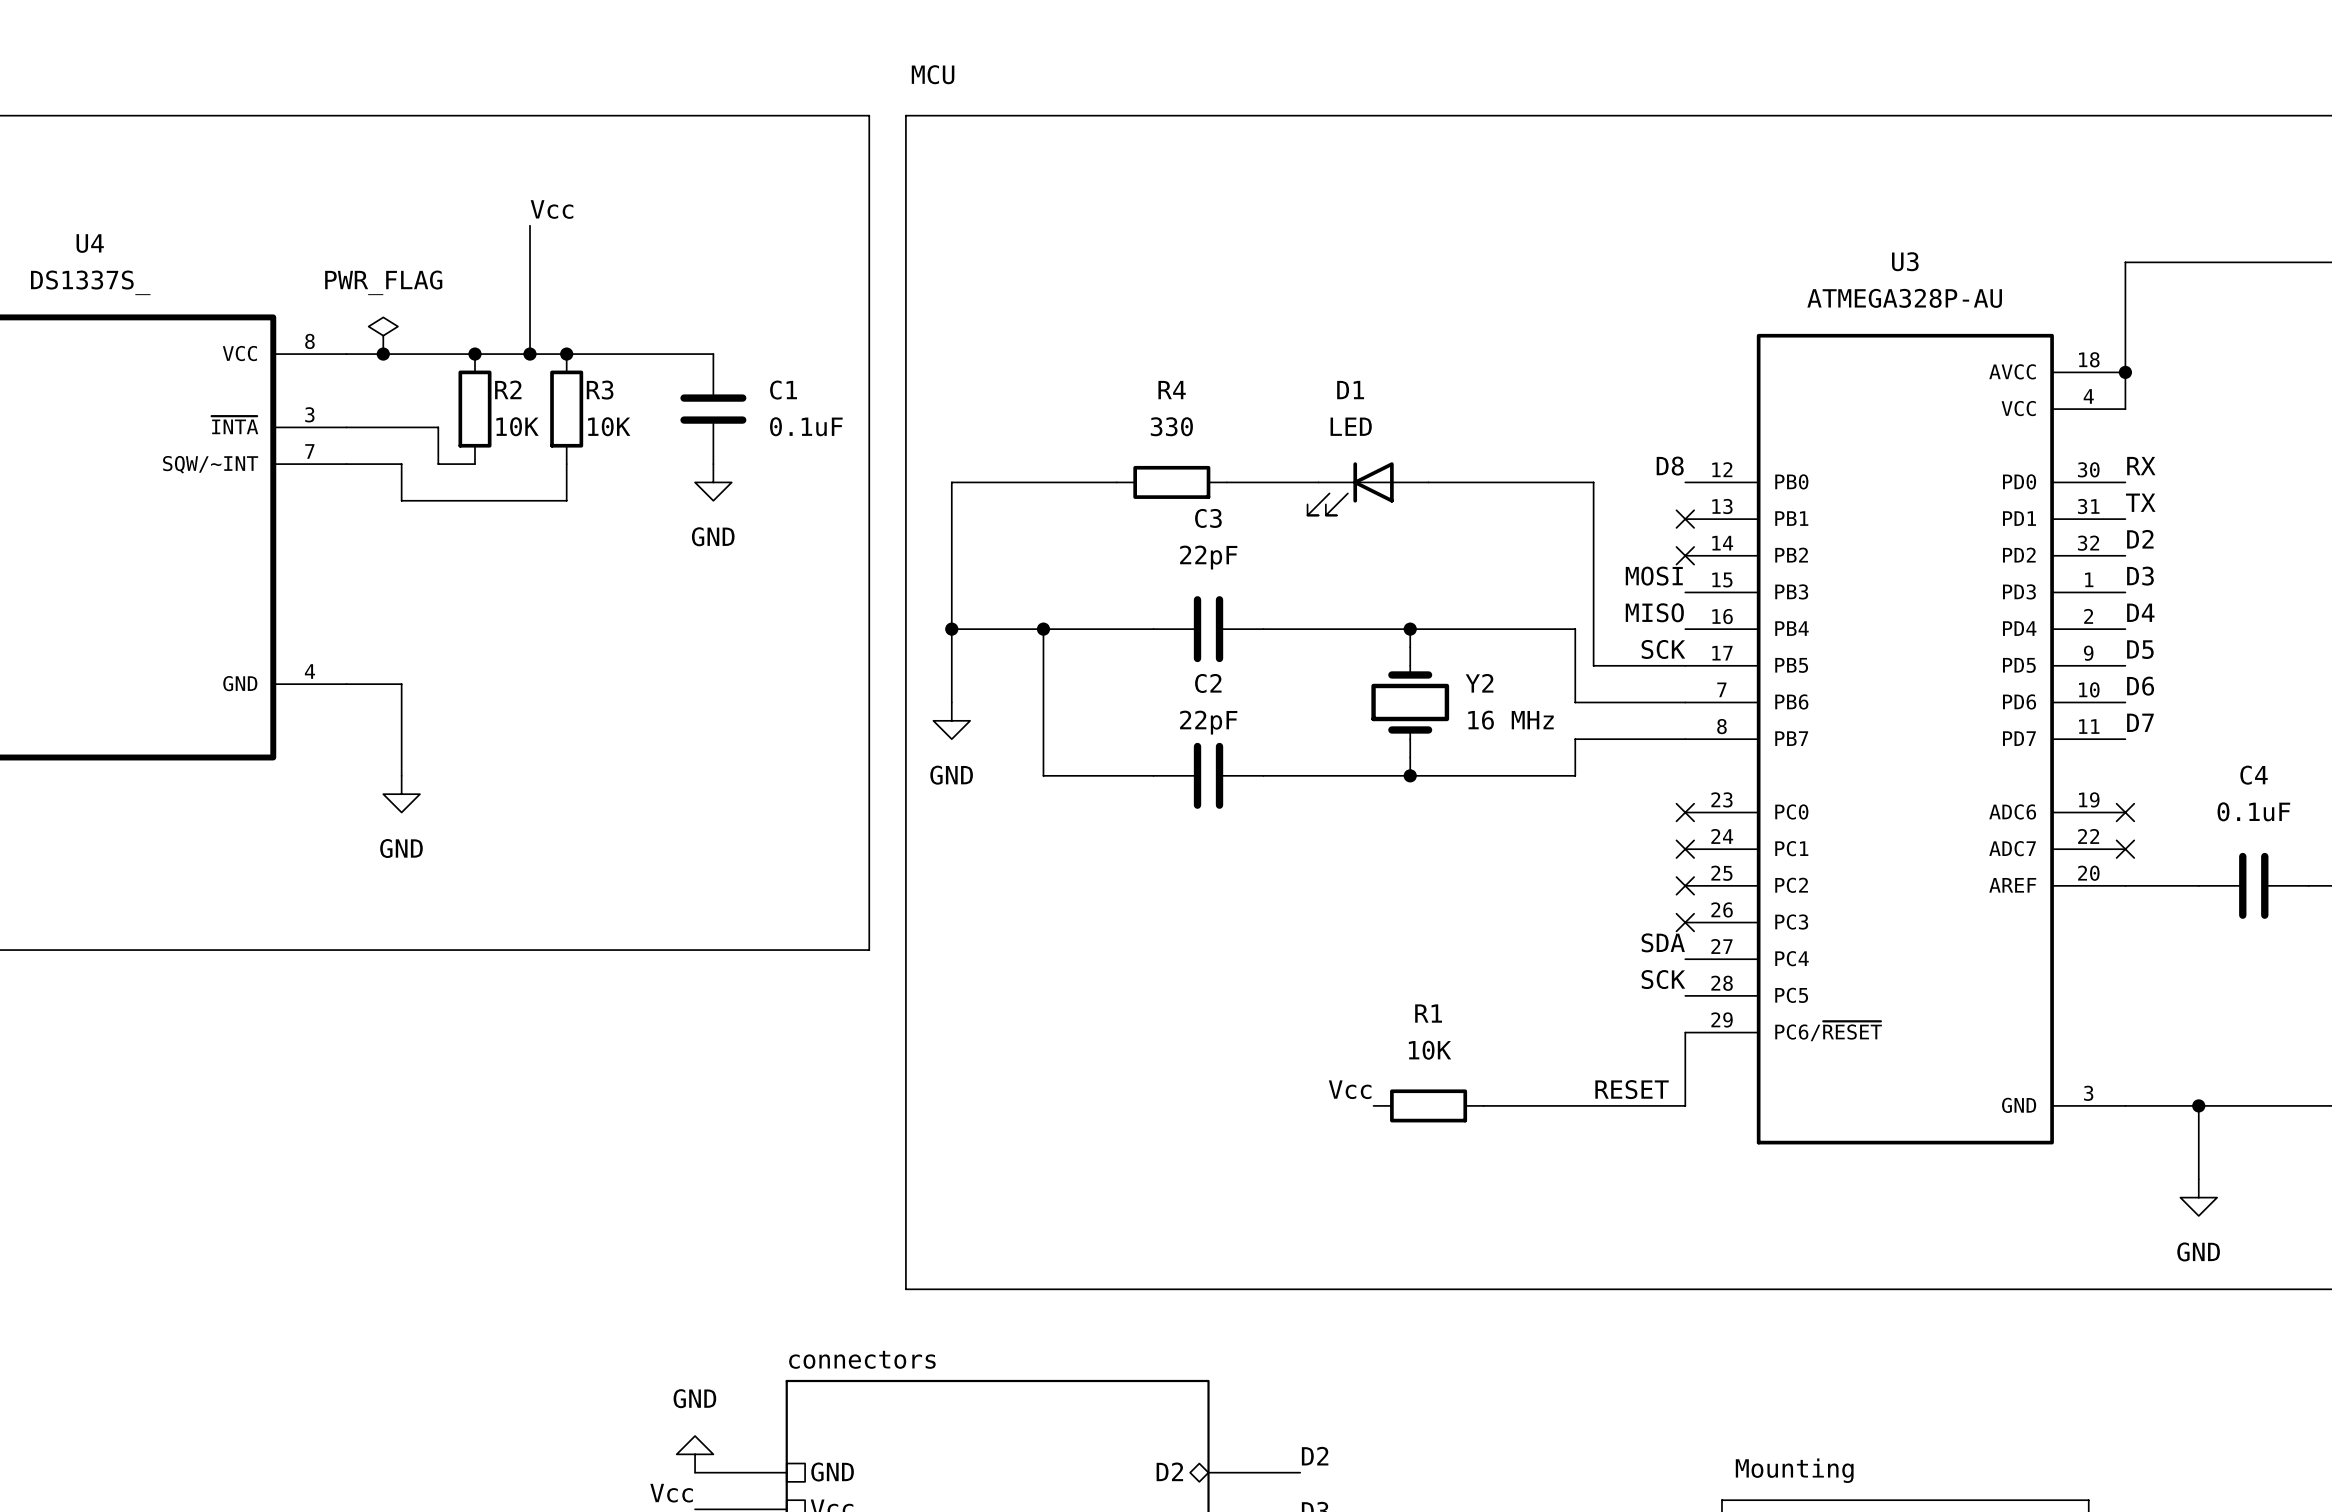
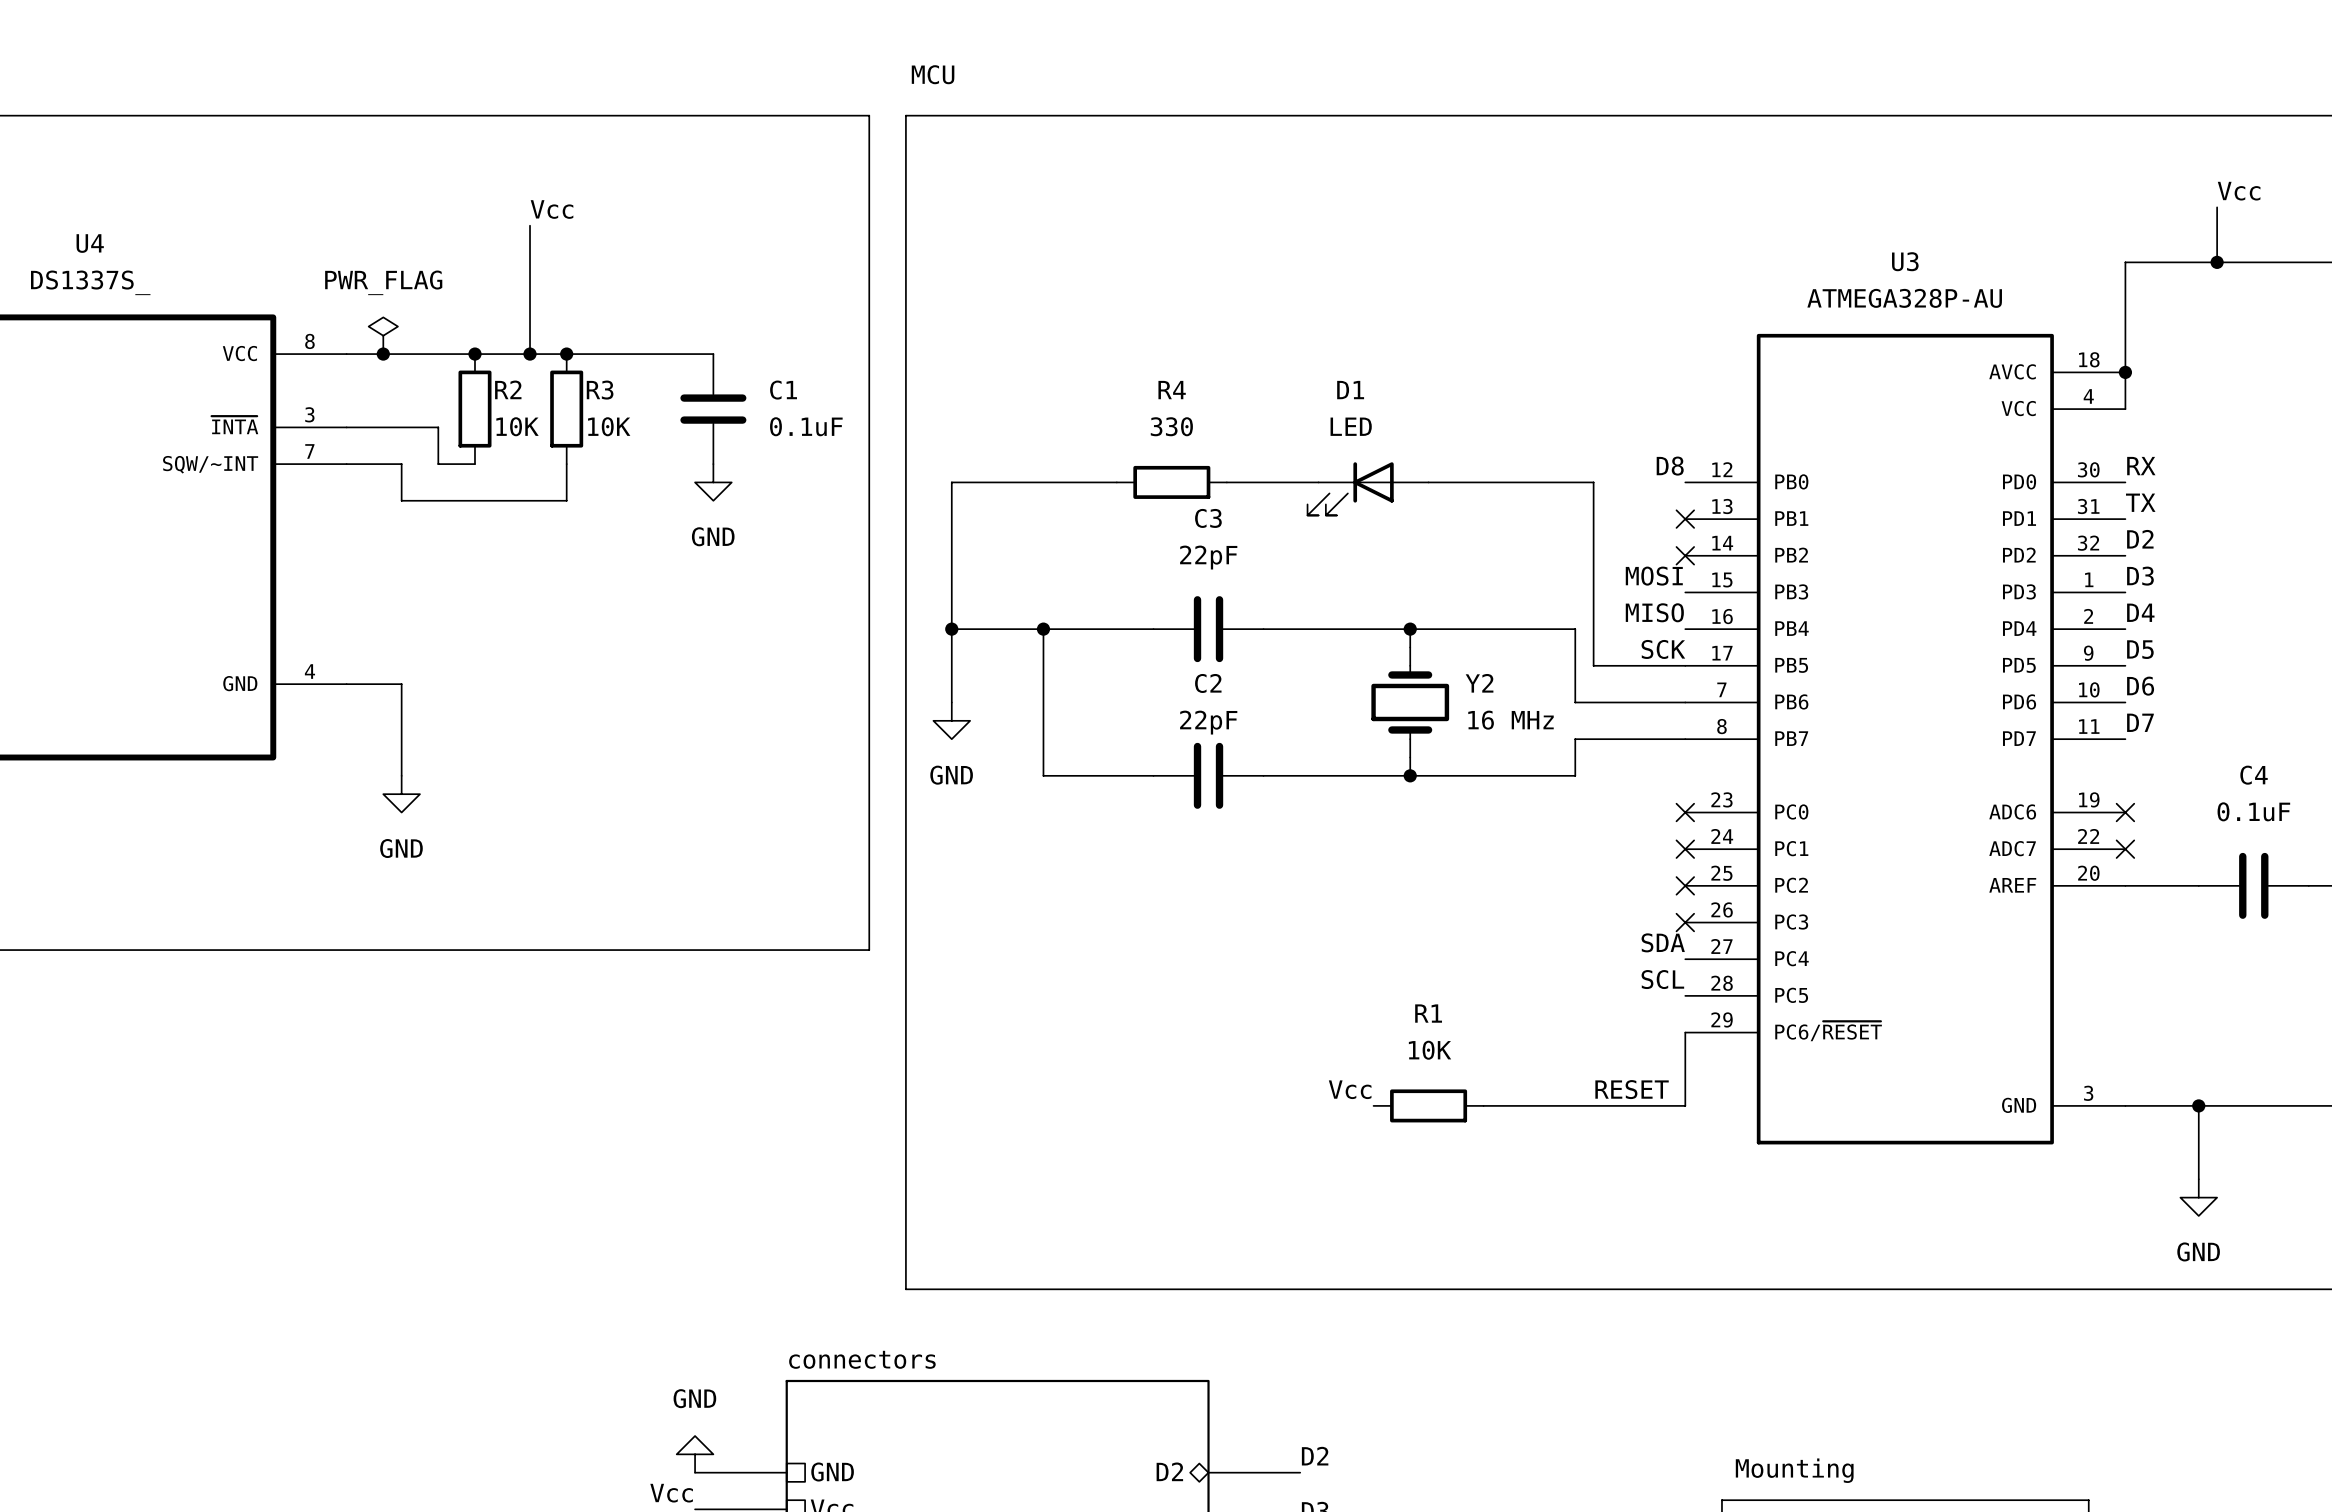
label: none -> Vcc (2239, 191)
wire: none -> (2217, 207) (2217, 262)
junction: none -> (2217, 262)
label: SCK (1663, 979) -> SCL (1662, 979)

